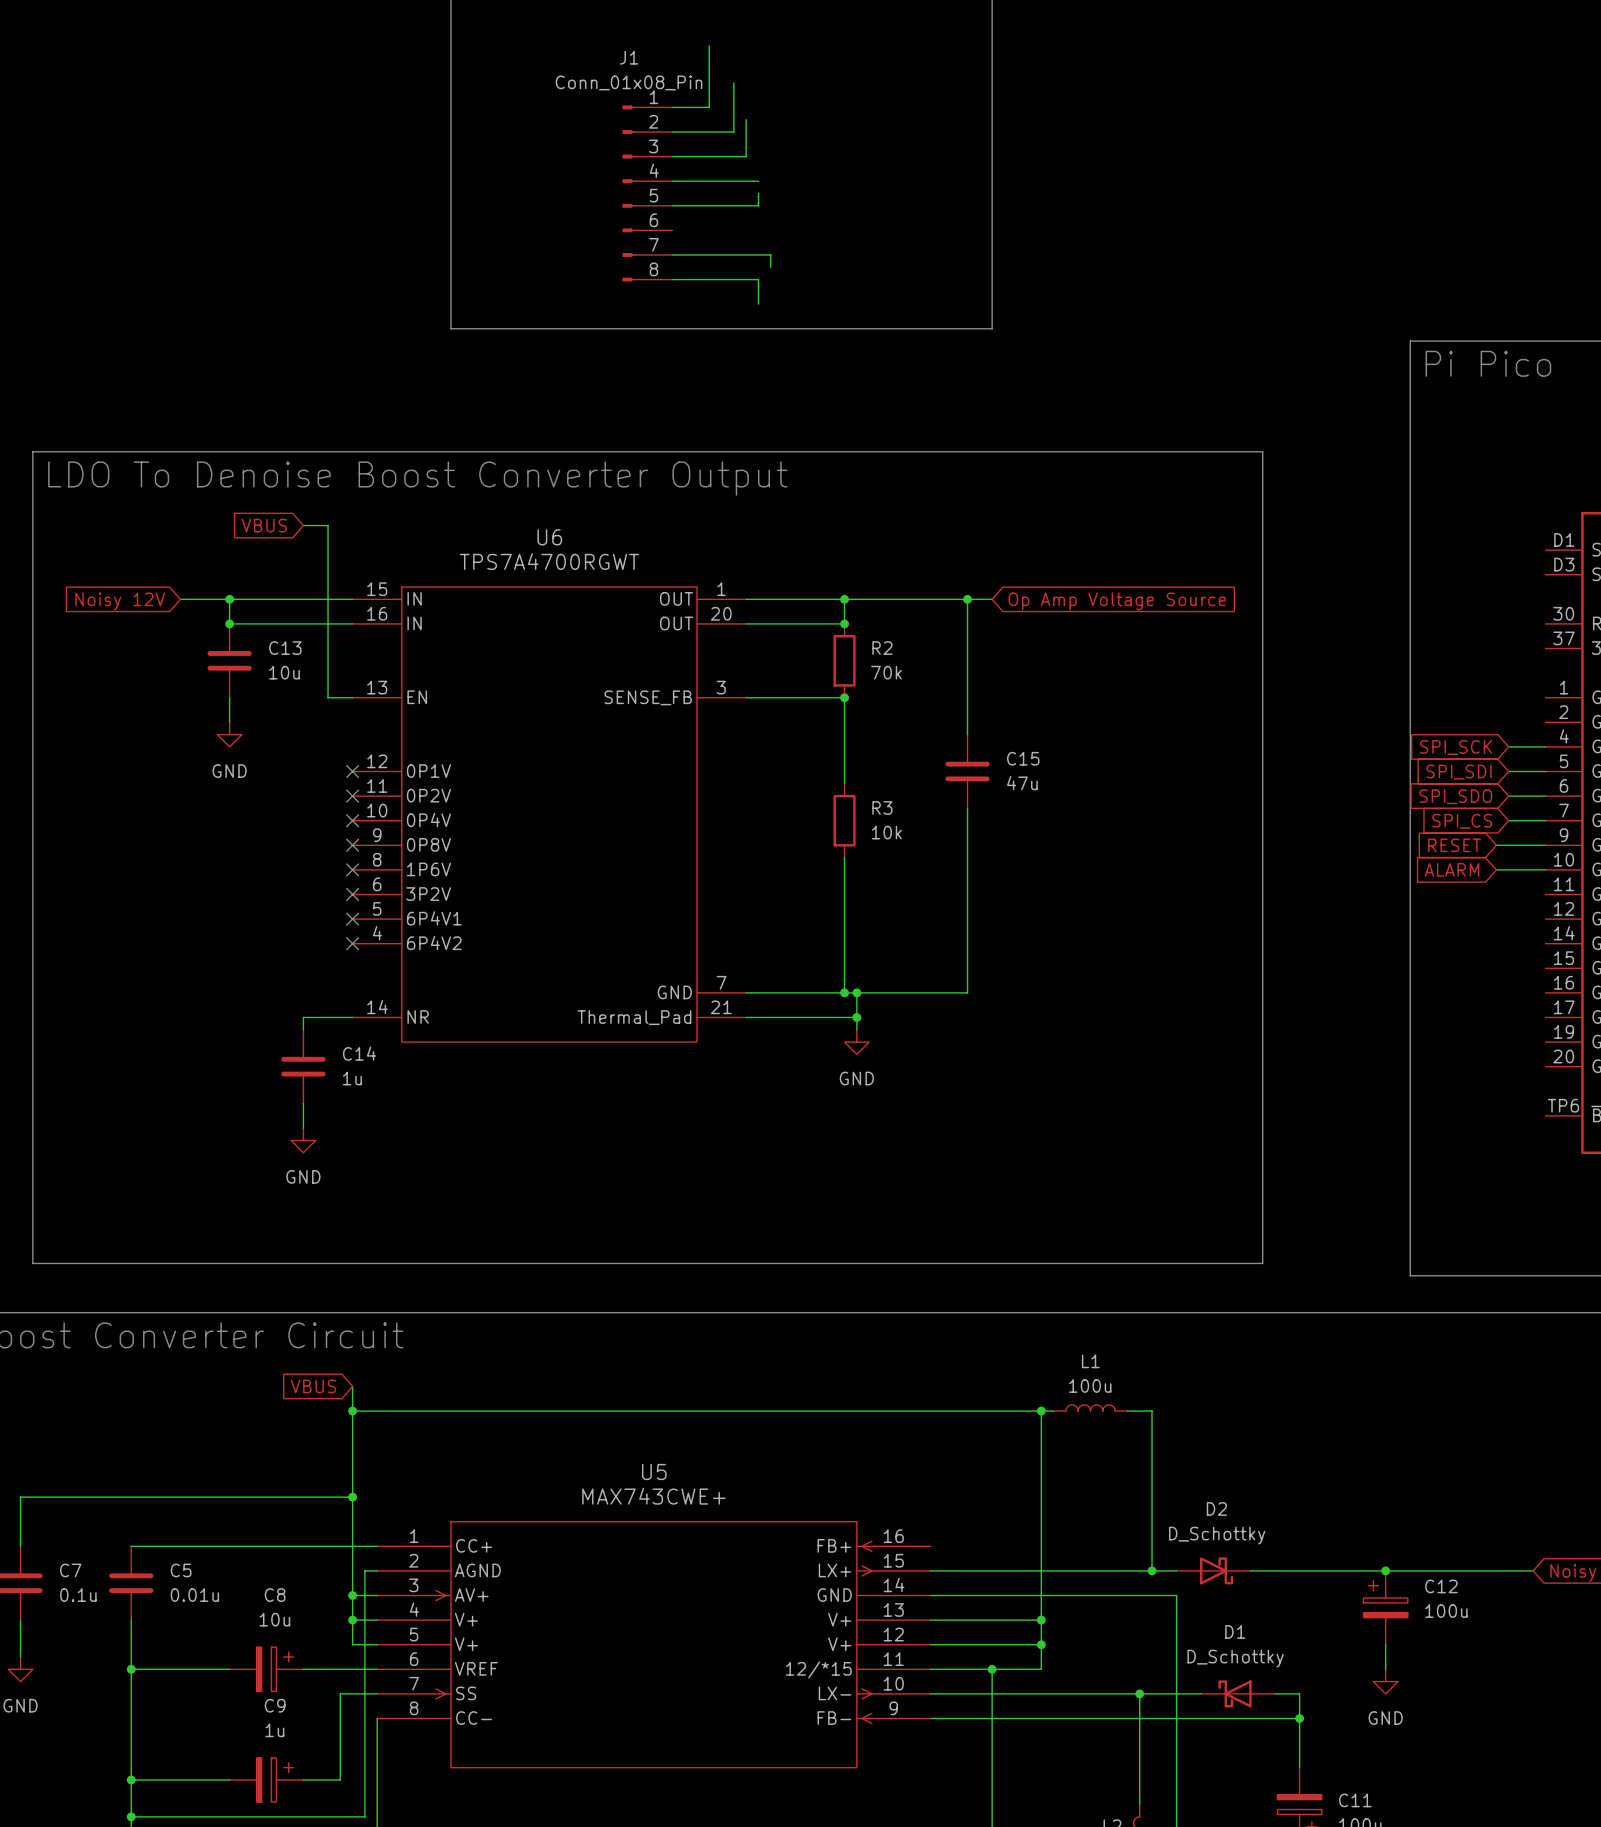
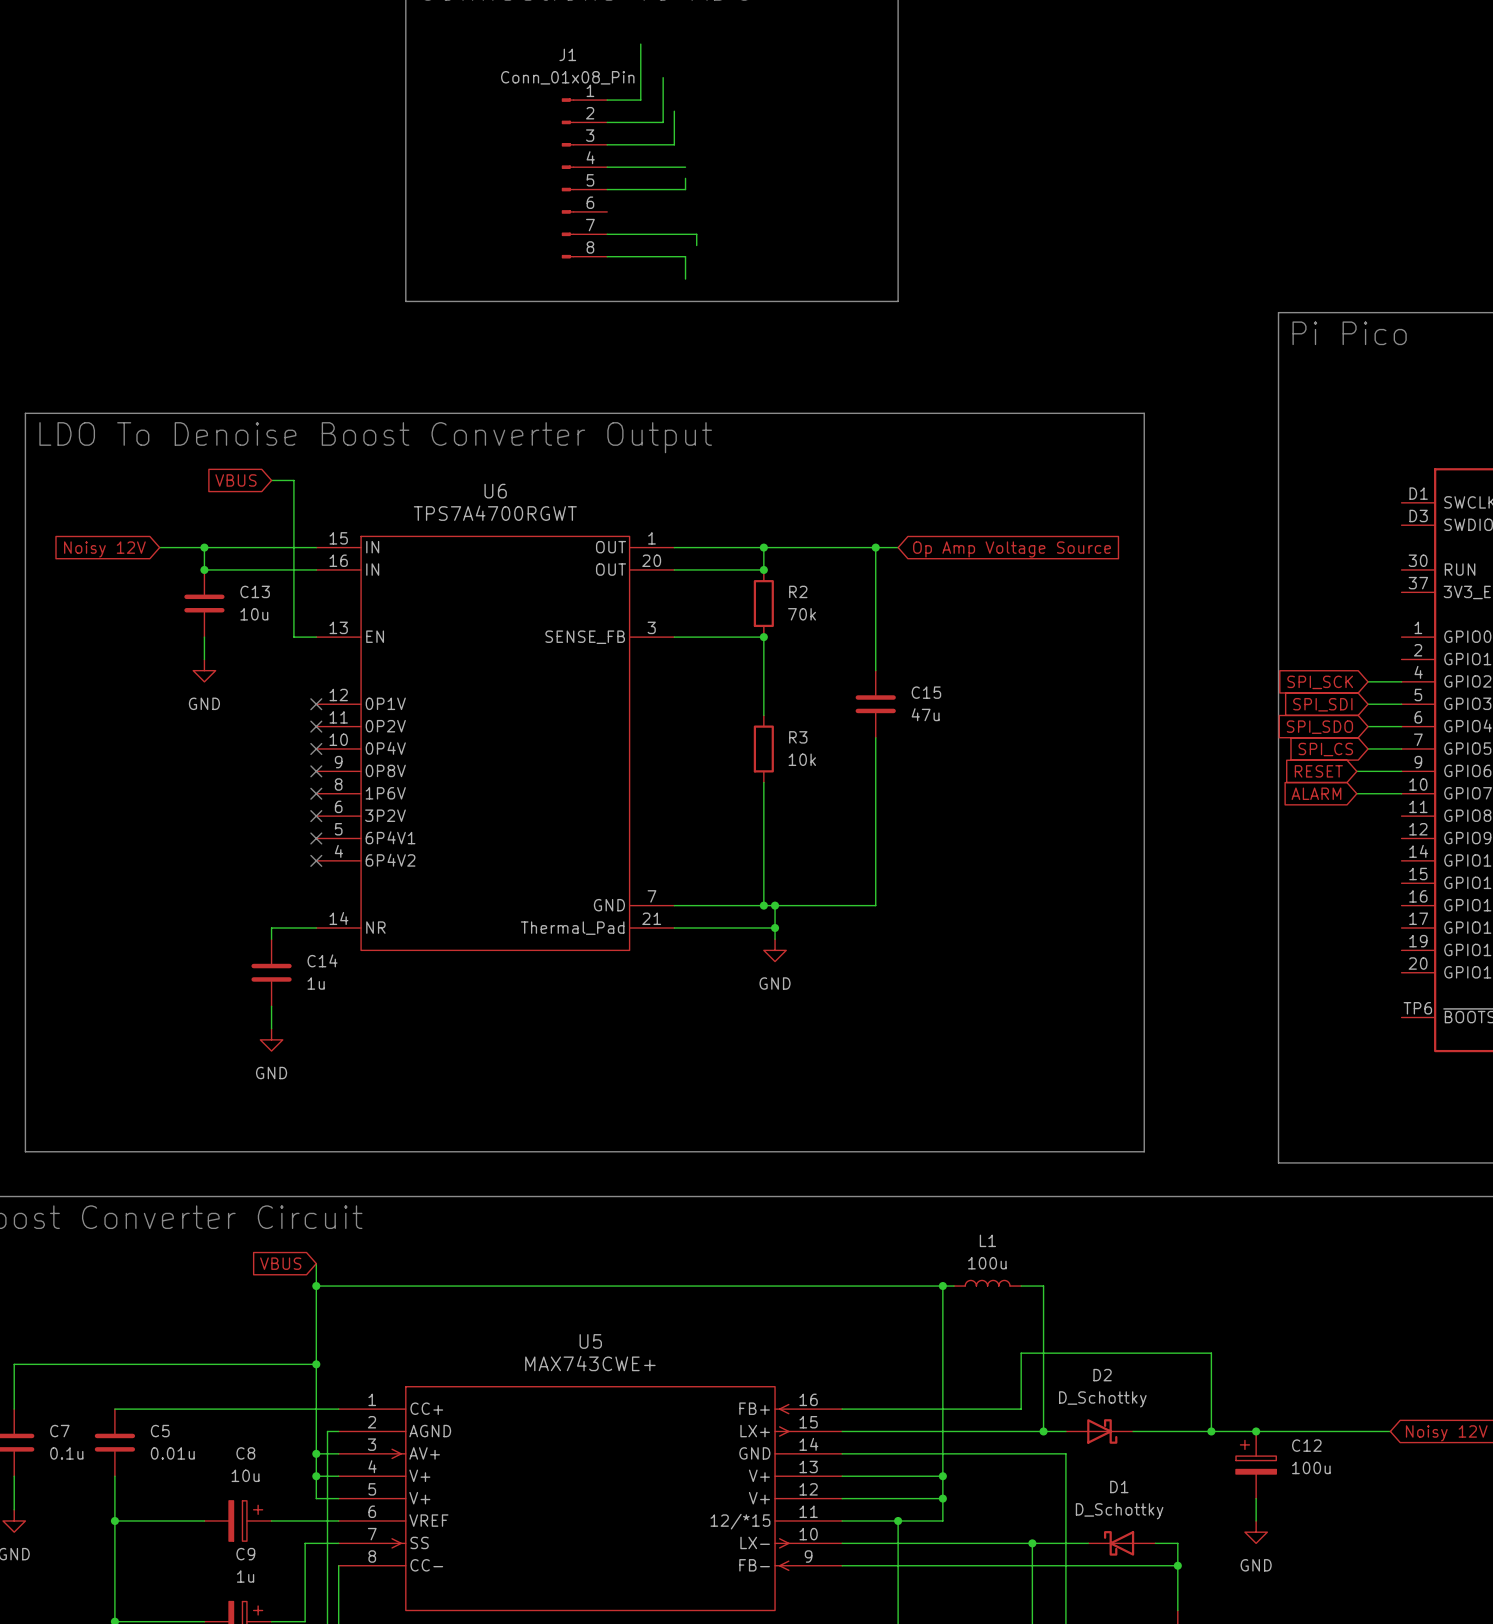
wire: none -> (842, 1409) (1021, 1409) (1021, 1353) (1211, 1353) (1211, 1431)
junction: none -> (1211, 1431)

